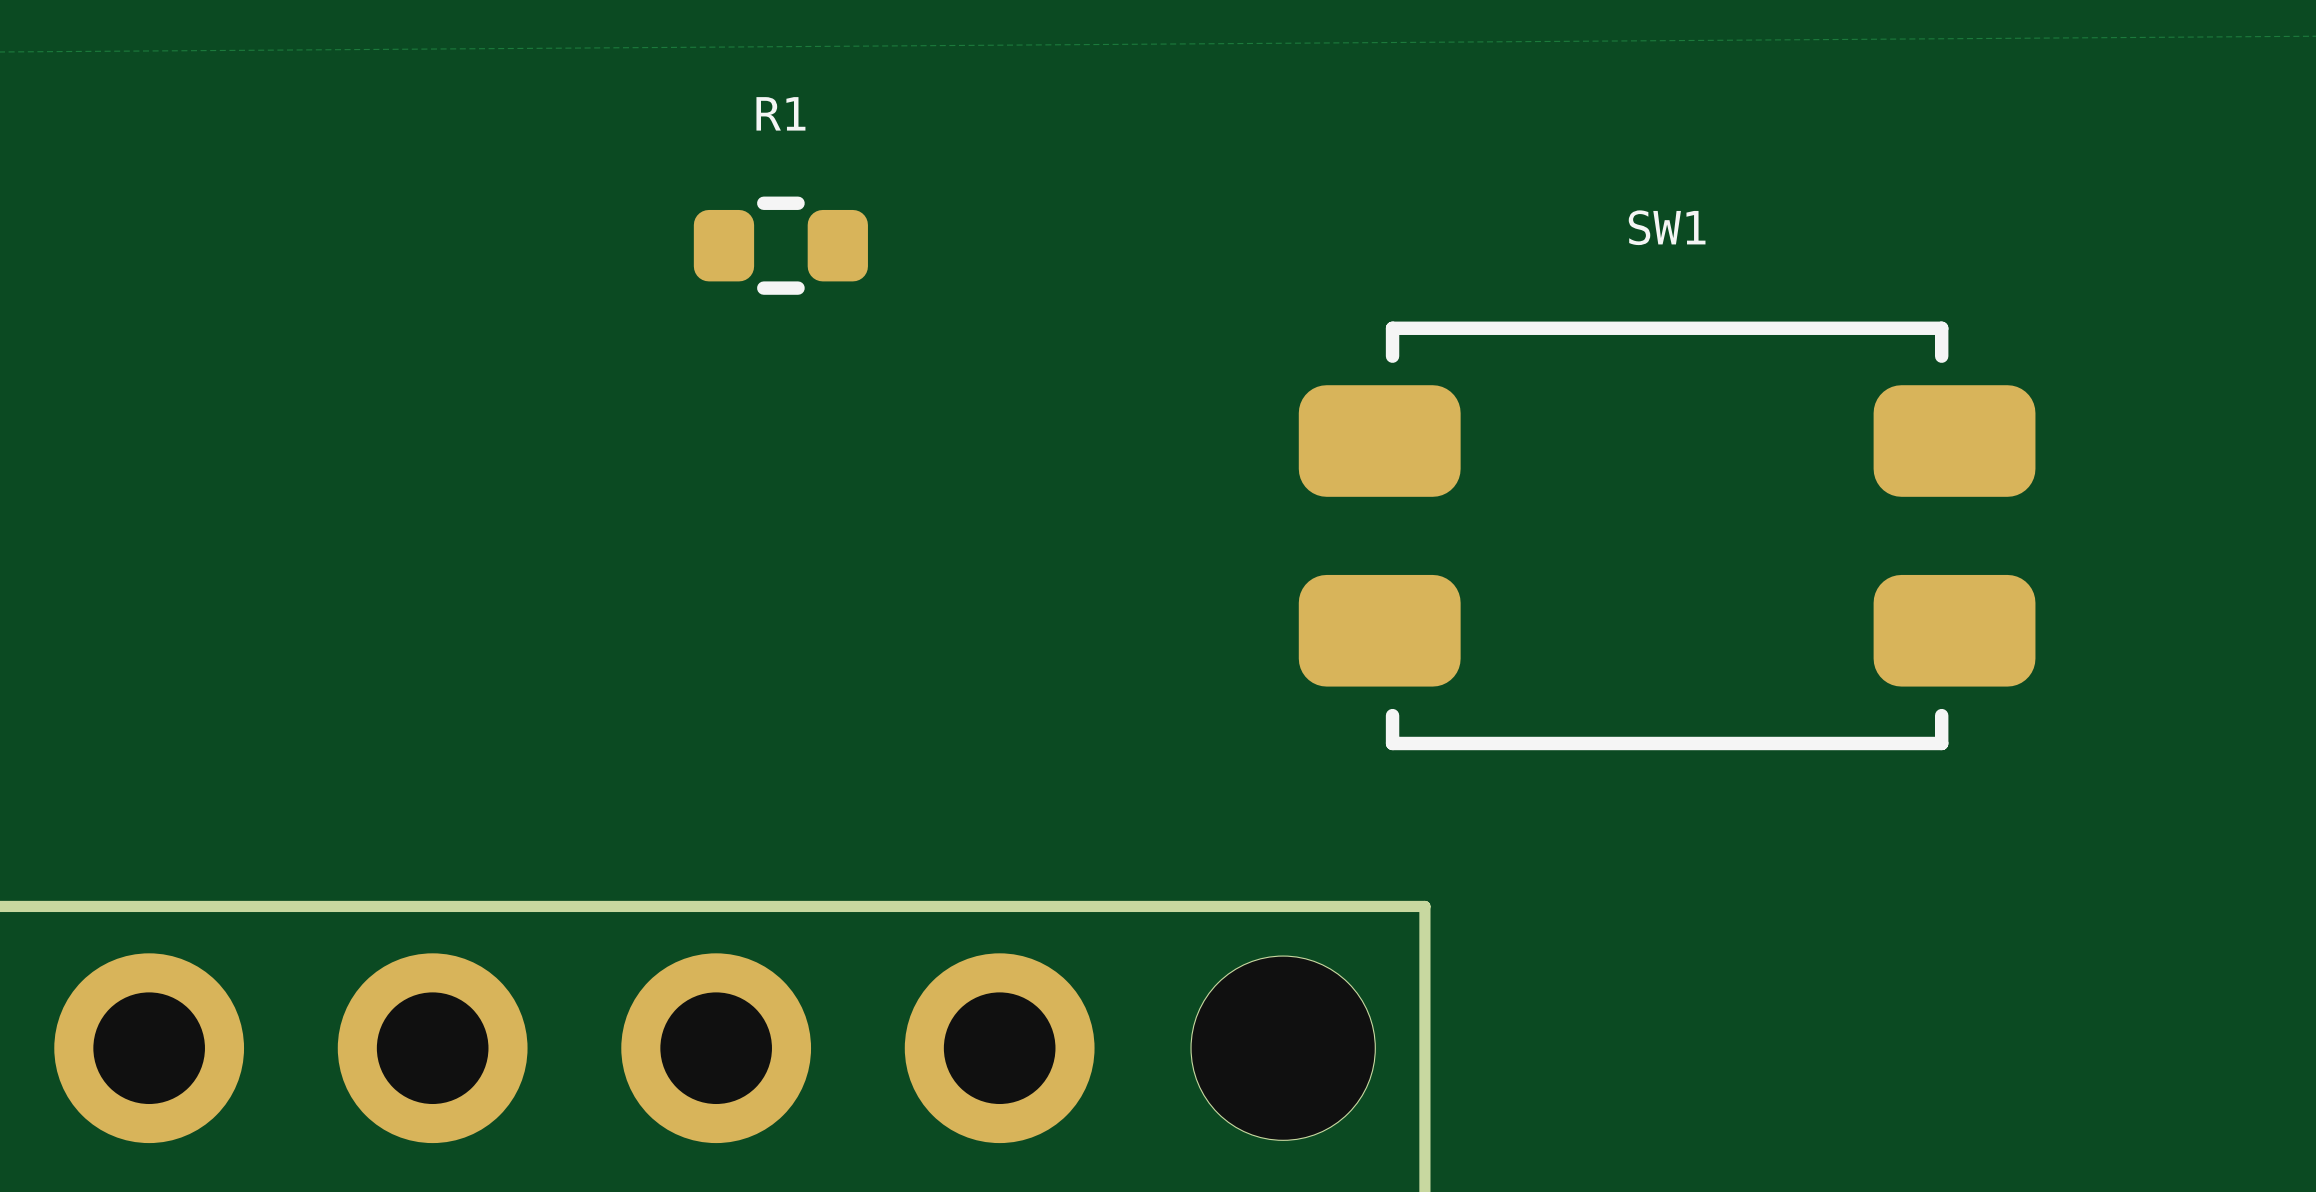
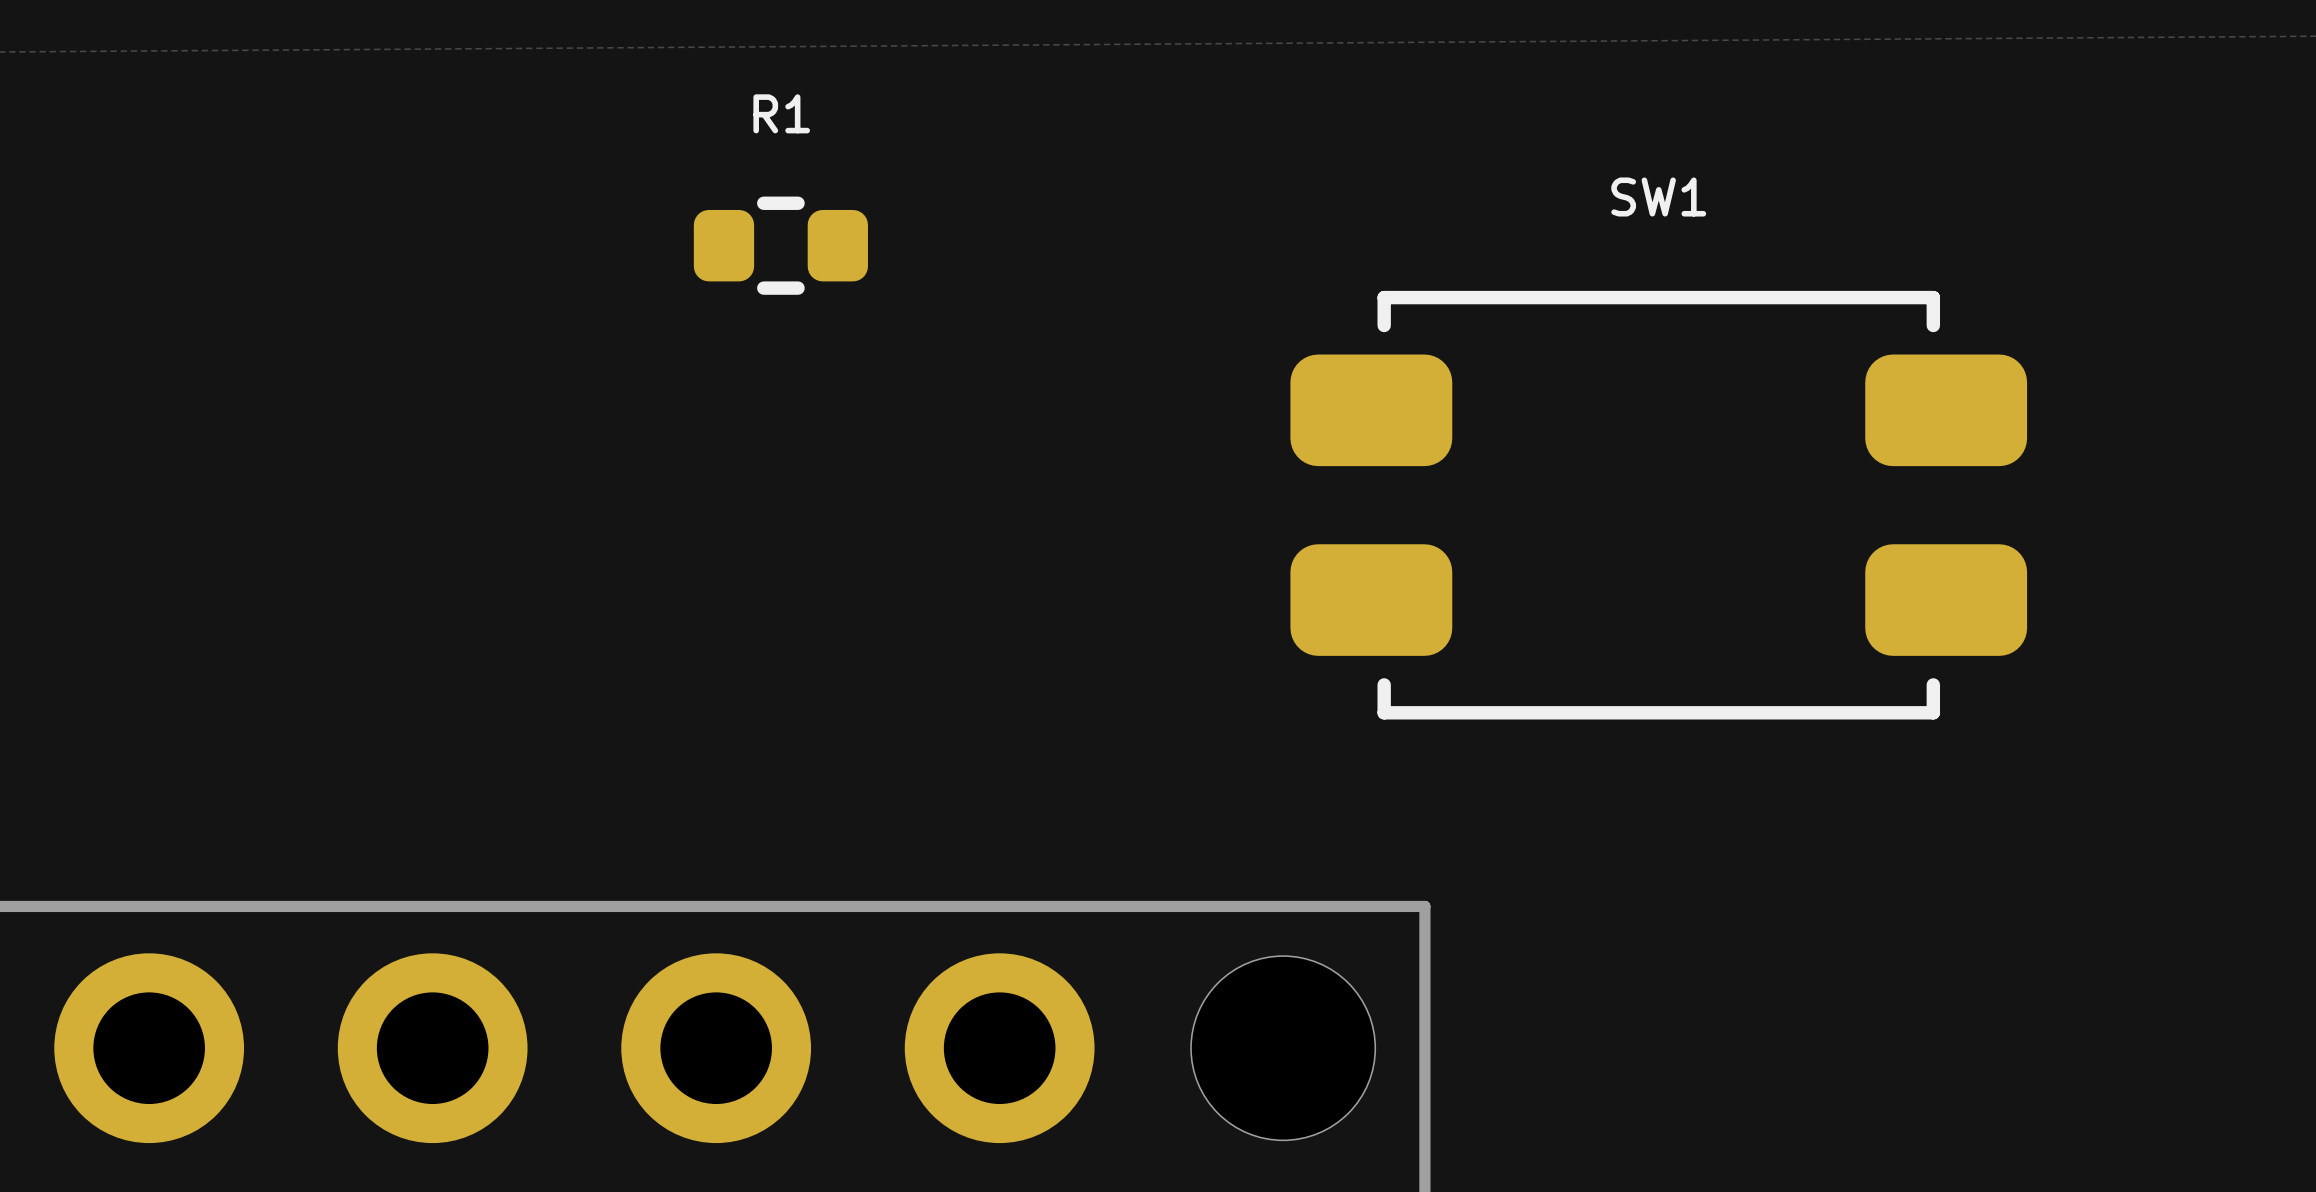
SW1 position: (1667, 535) -> (1658, 505)

